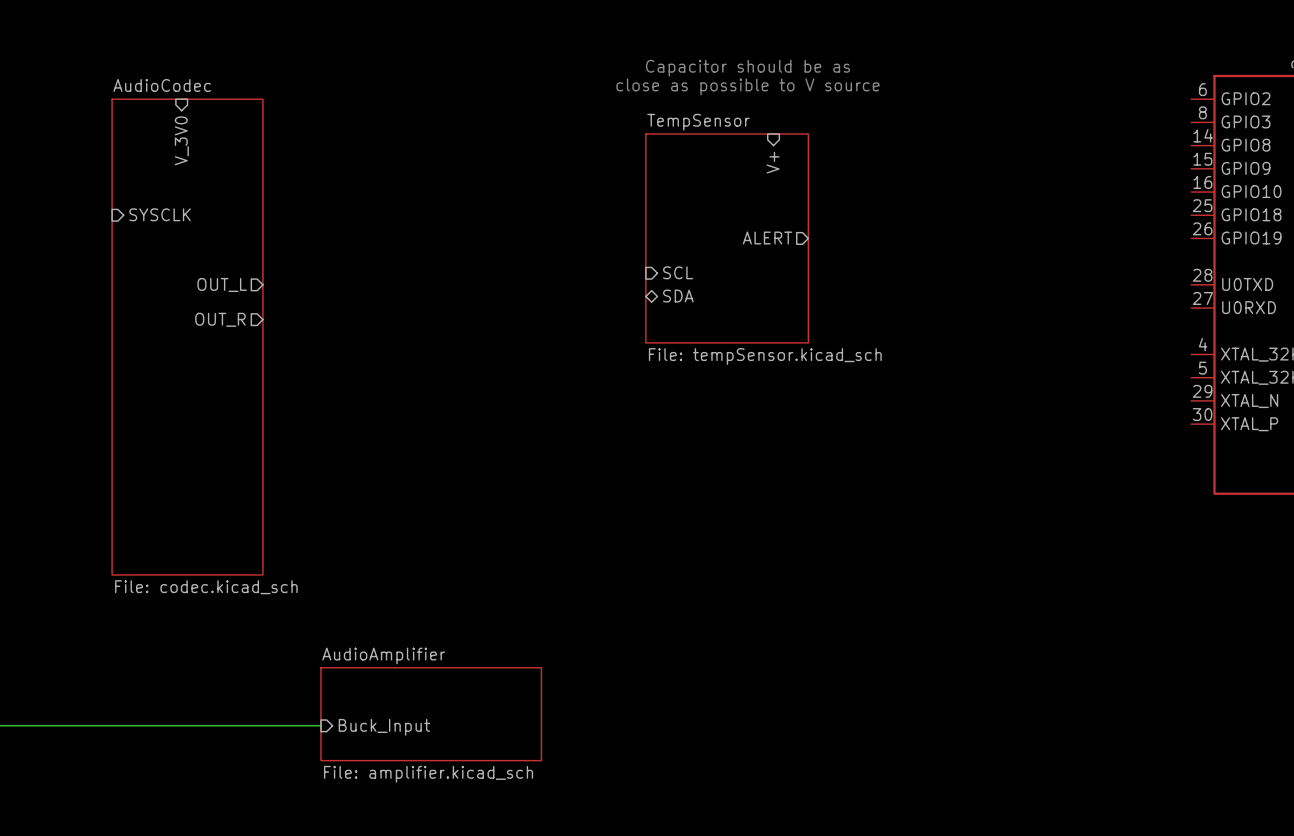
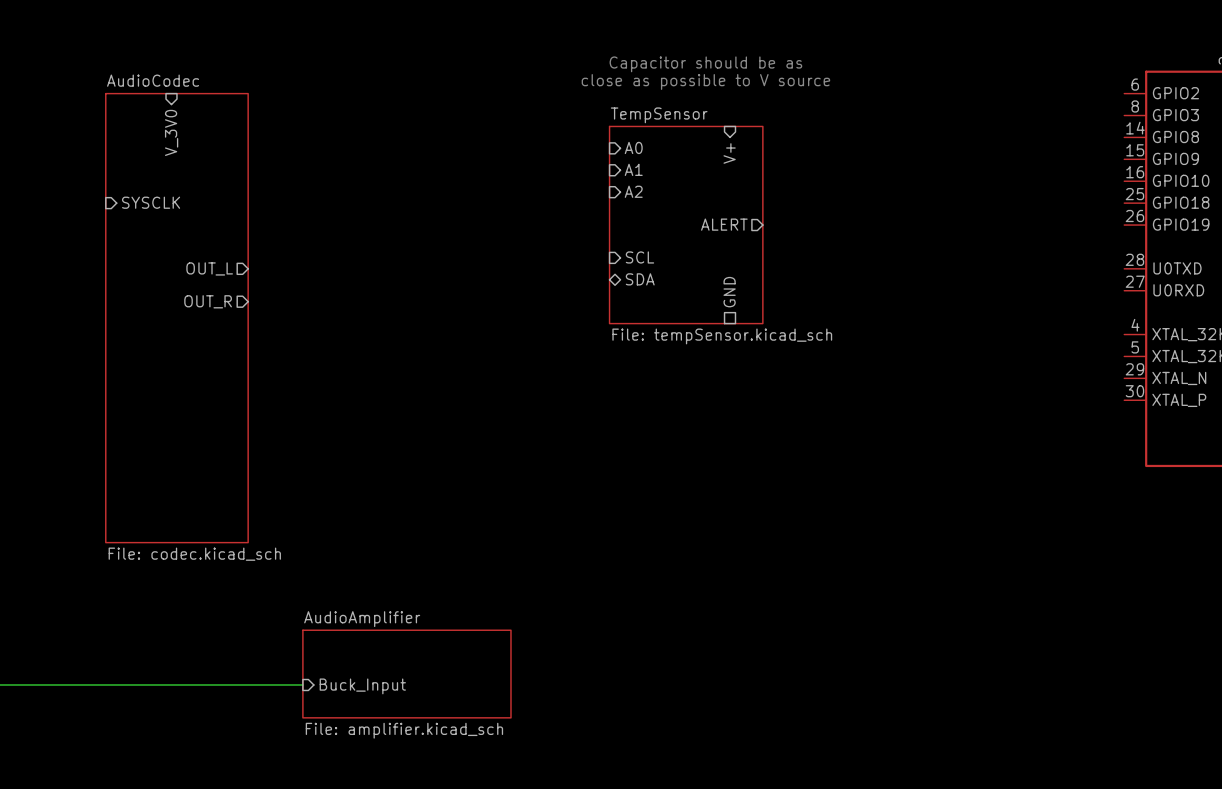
sheet pin: none -> A0 (633, 147)
sheet pin: none -> A1 (633, 169)
sheet pin: none -> A2 (633, 191)
sheet pin: none -> GND (729, 292)

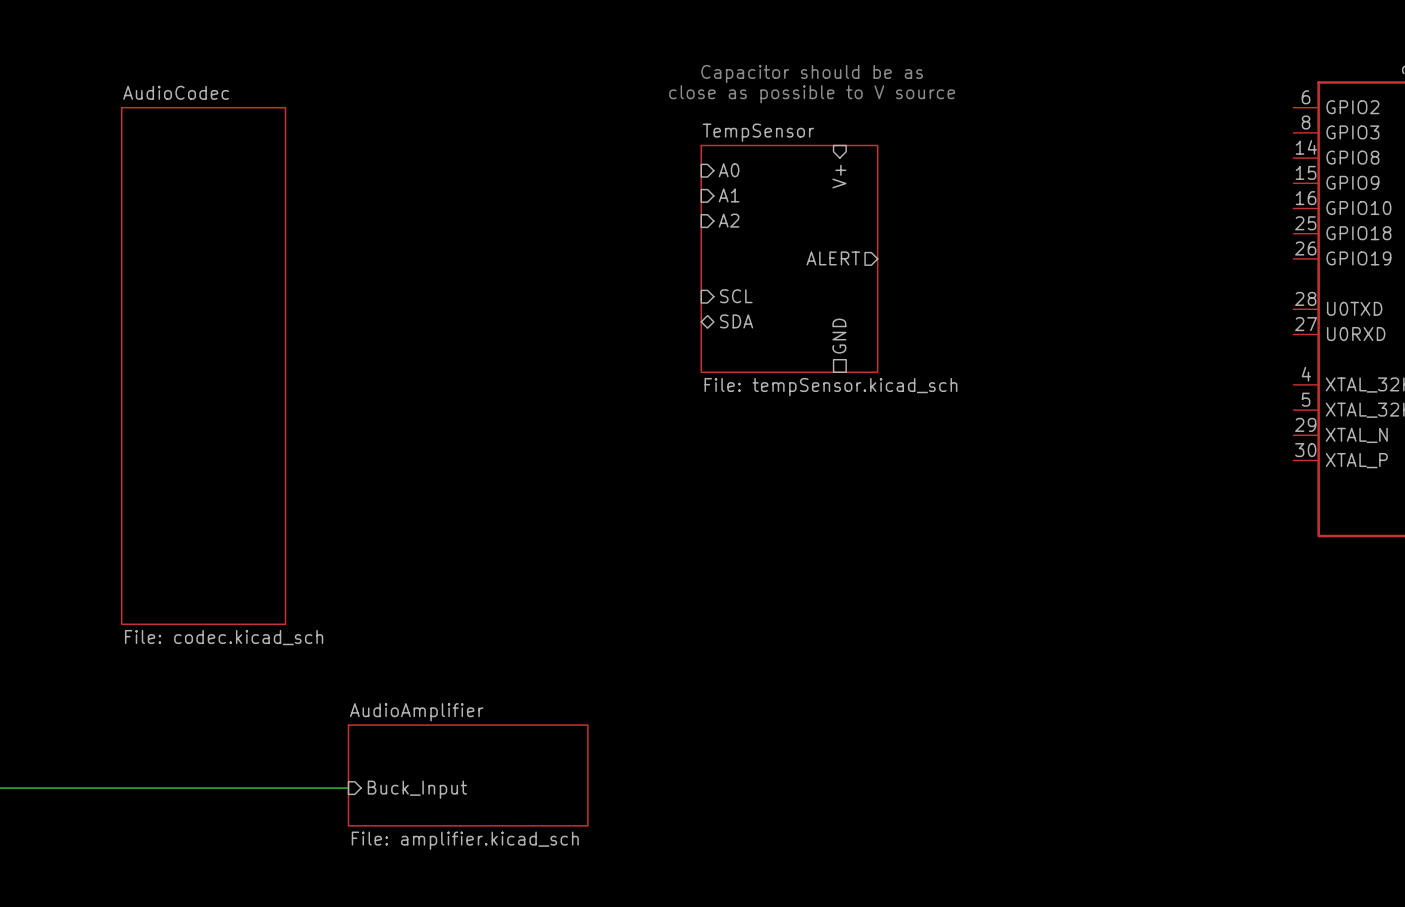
sheet pin: V_3V0 (171, 132) -> none
sheet pin: SYSCLK (151, 202) -> none
sheet pin: OUT_L (209, 268) -> none
sheet pin: OUT_R (208, 301) -> none

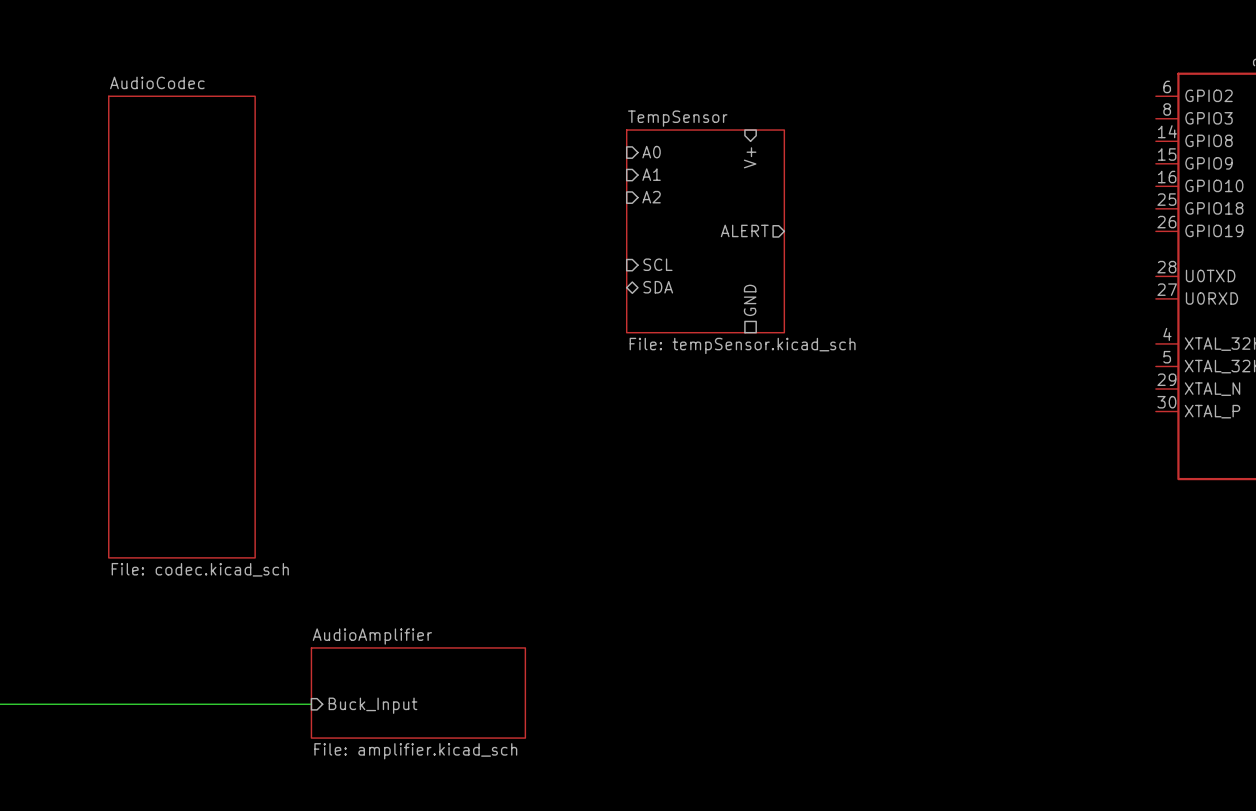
text: Capacitor should be as (812, 74) -> none
text: close as possible to V source (812, 94) -> none

